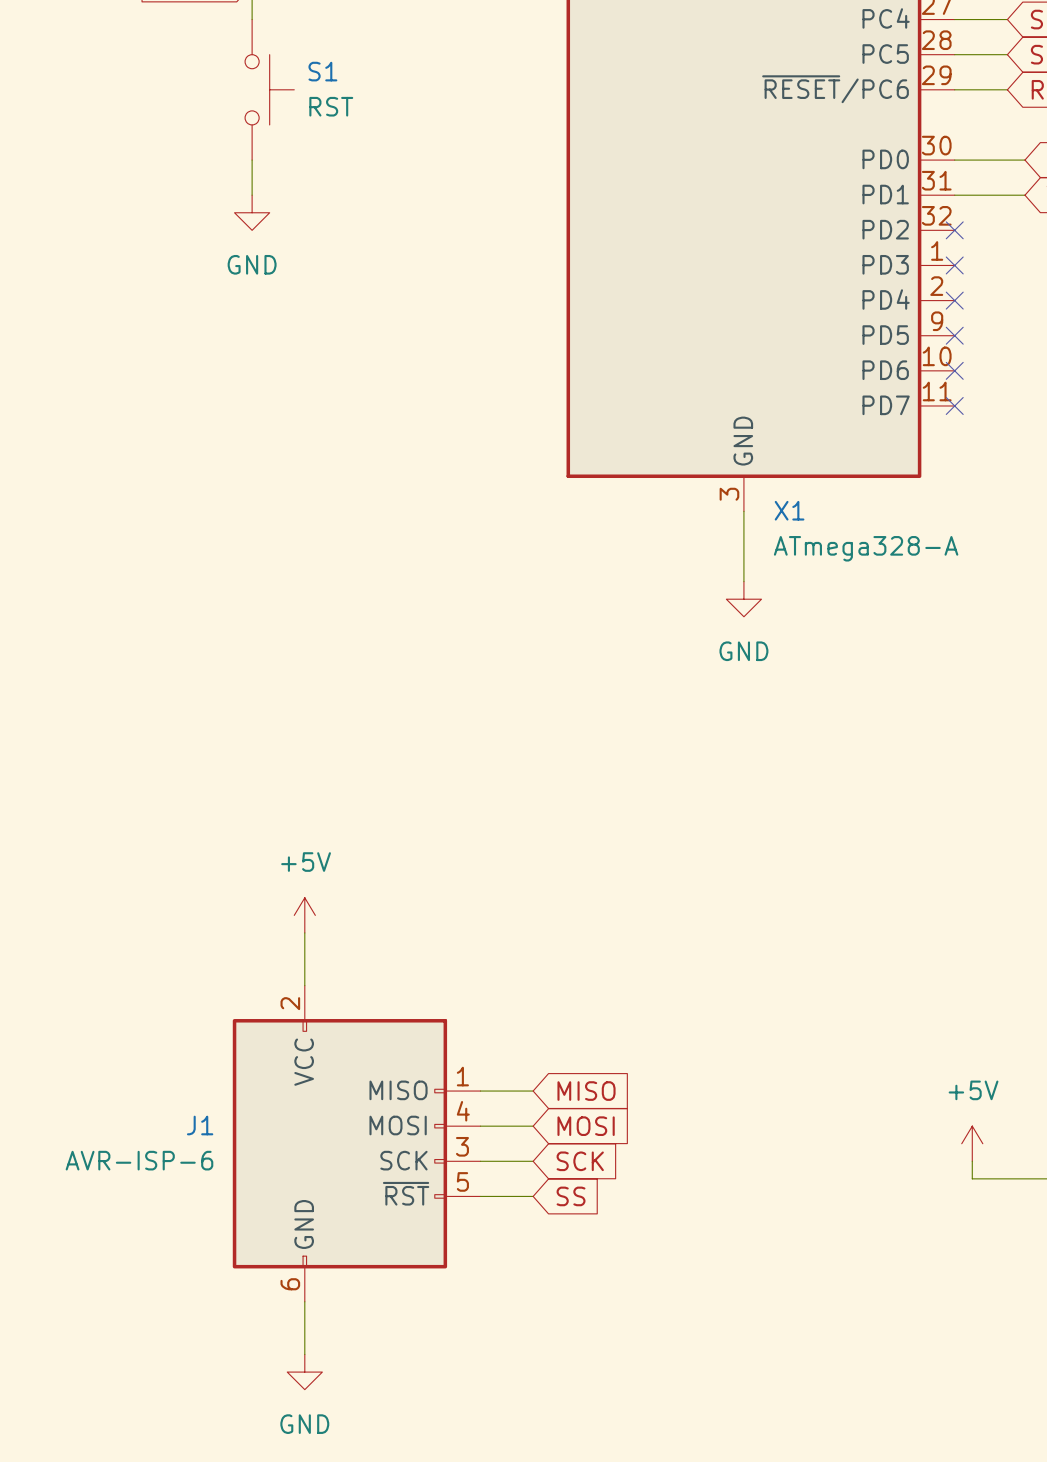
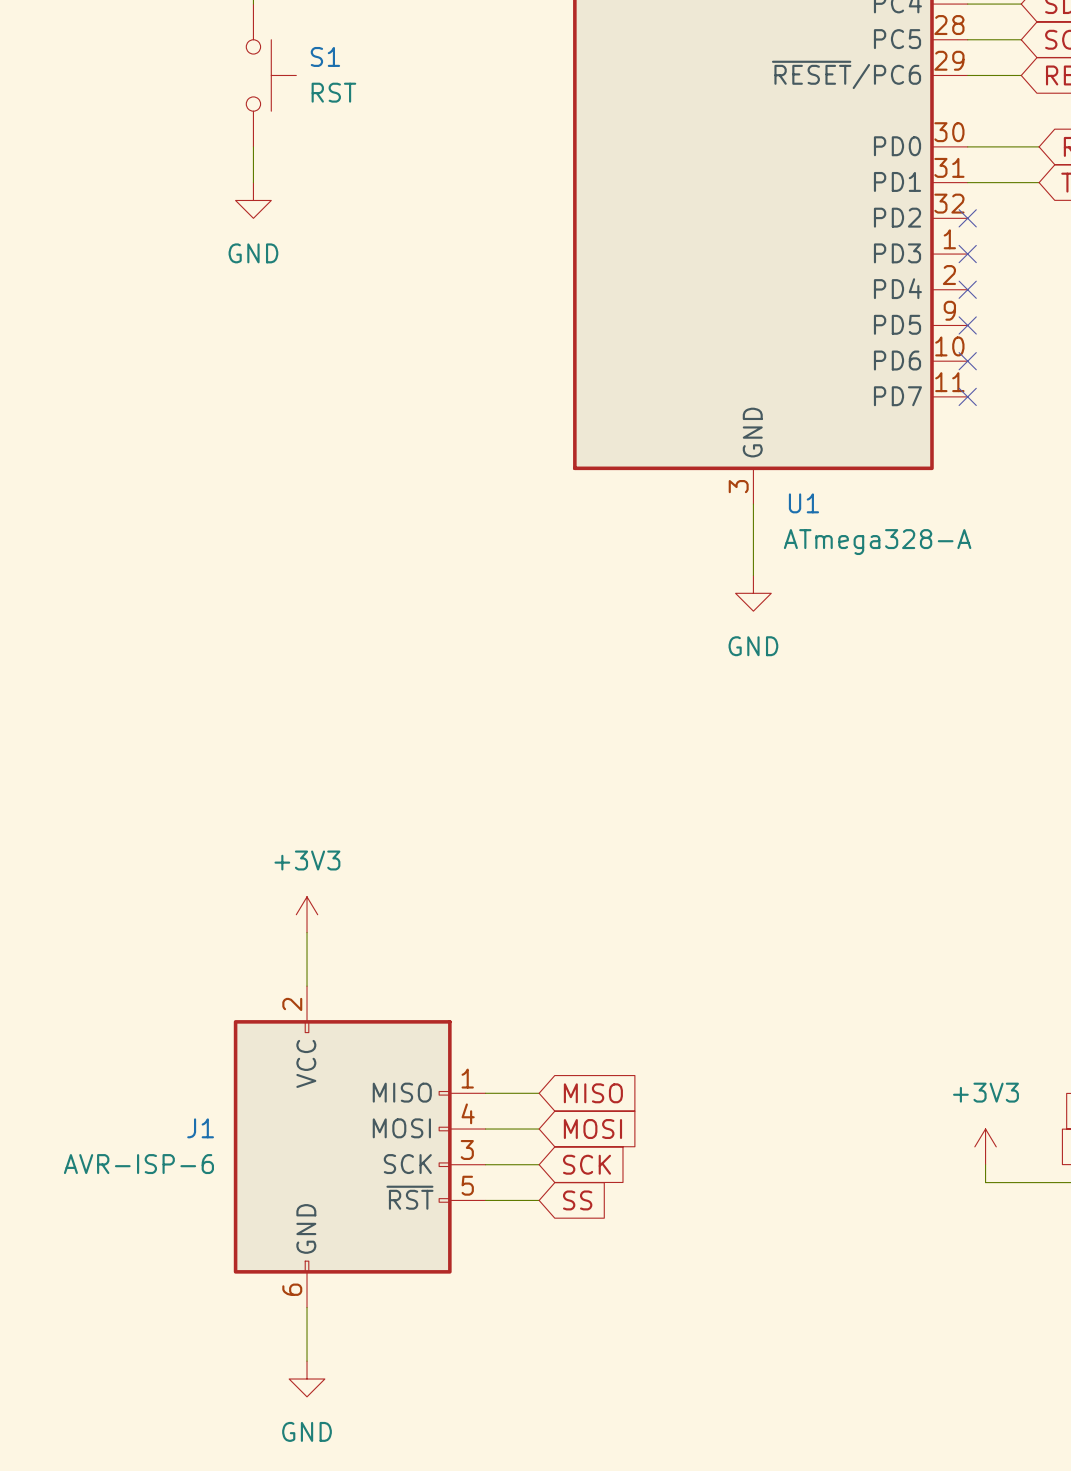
X1 name: X1 (789, 510) -> U1 (803, 503)
power symbol: +5V (304, 915) -> +3V3 (307, 914)
power symbol: +5V (972, 1143) -> +3V3 (985, 1146)

